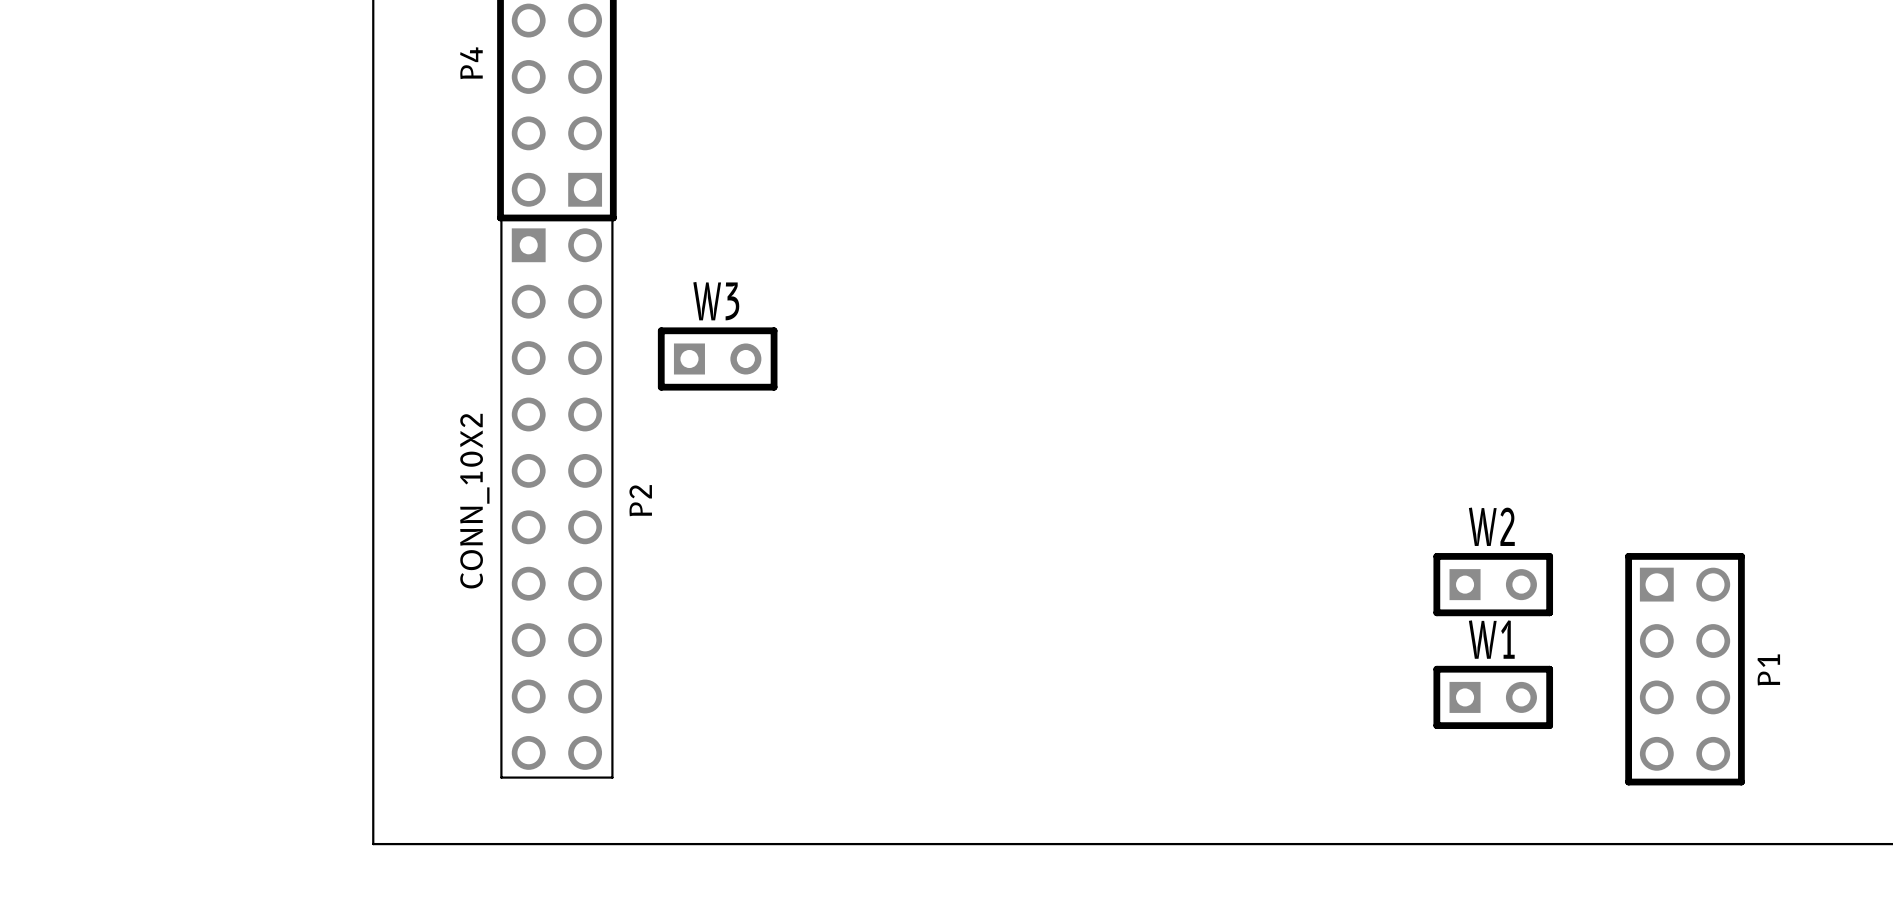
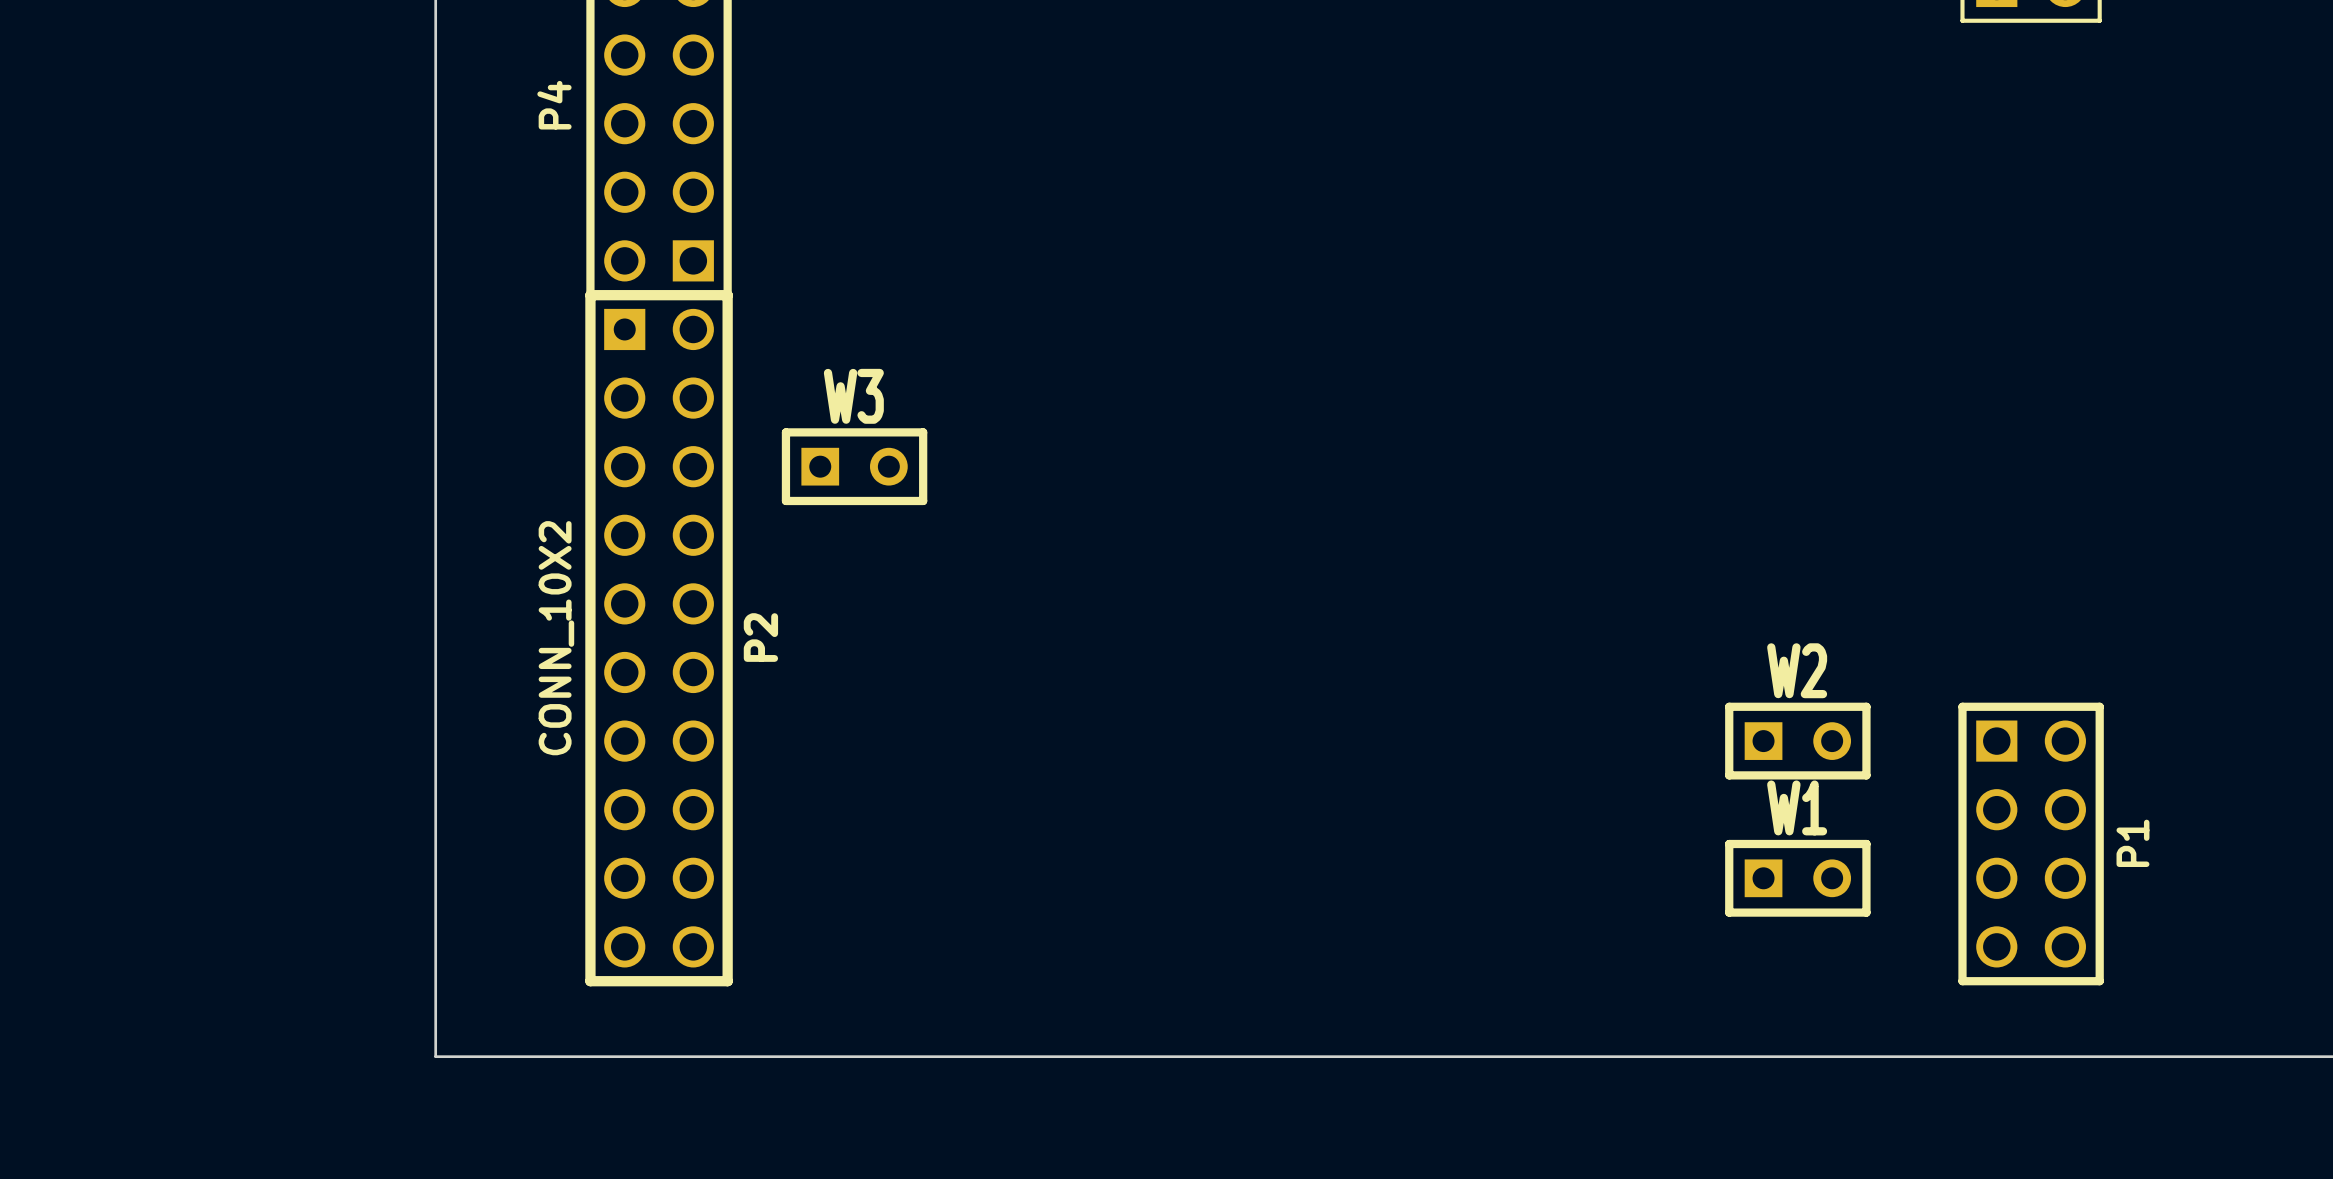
P2 footprint: [500, 215, 614, 779] -> [585, 290, 733, 987]

